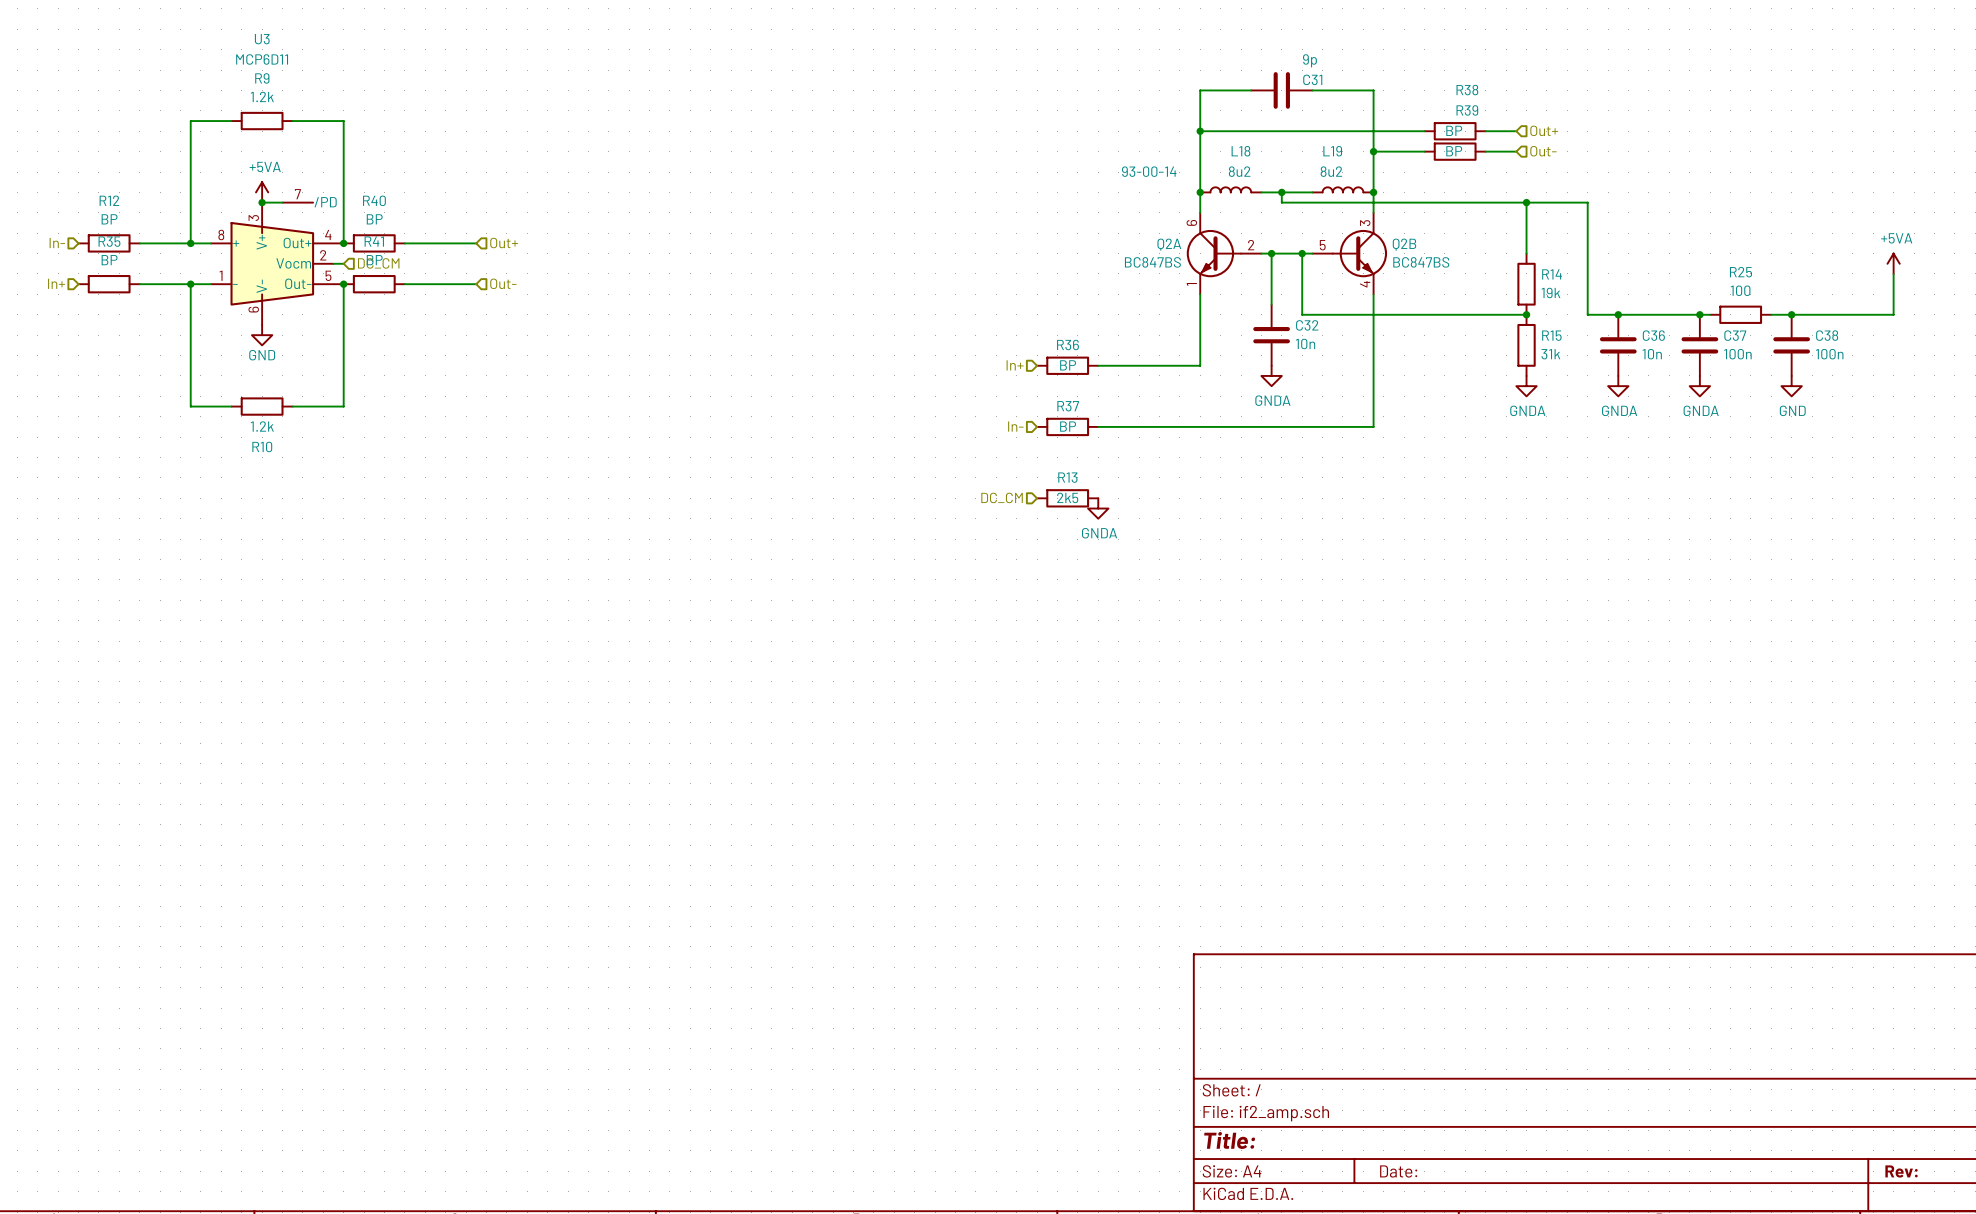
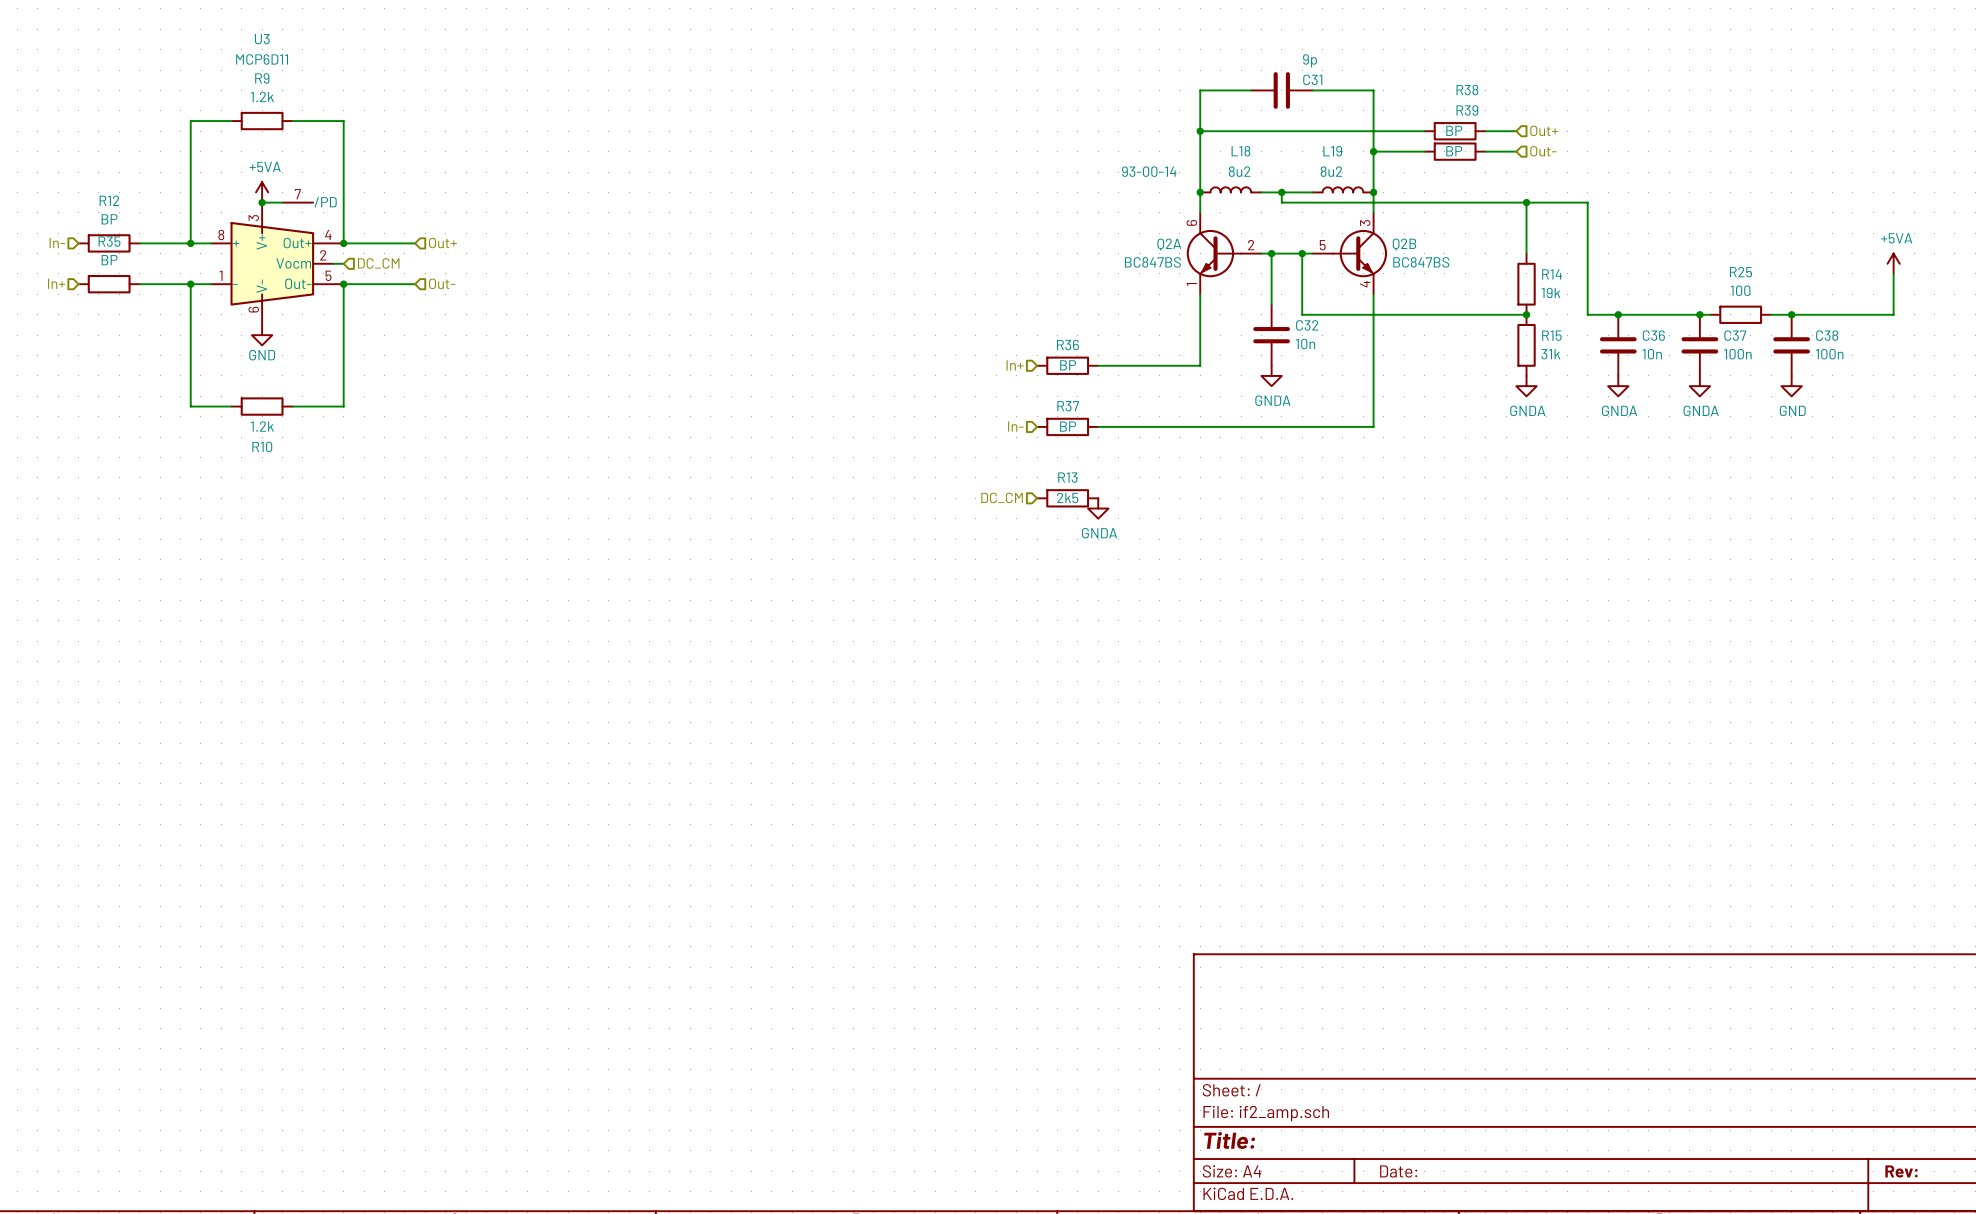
R40: BP (374, 243) -> none
wire: (415, 243) (476, 243) -> (343, 243) (404, 243)
hierarchical label position: Out+ (504, 243) -> Out+ (442, 243)
hierarchical label position: Out- (503, 283) -> Out- (442, 283)
R41: BP (374, 284) -> none
wire: (415, 284) (476, 284) -> (343, 284) (404, 284)

